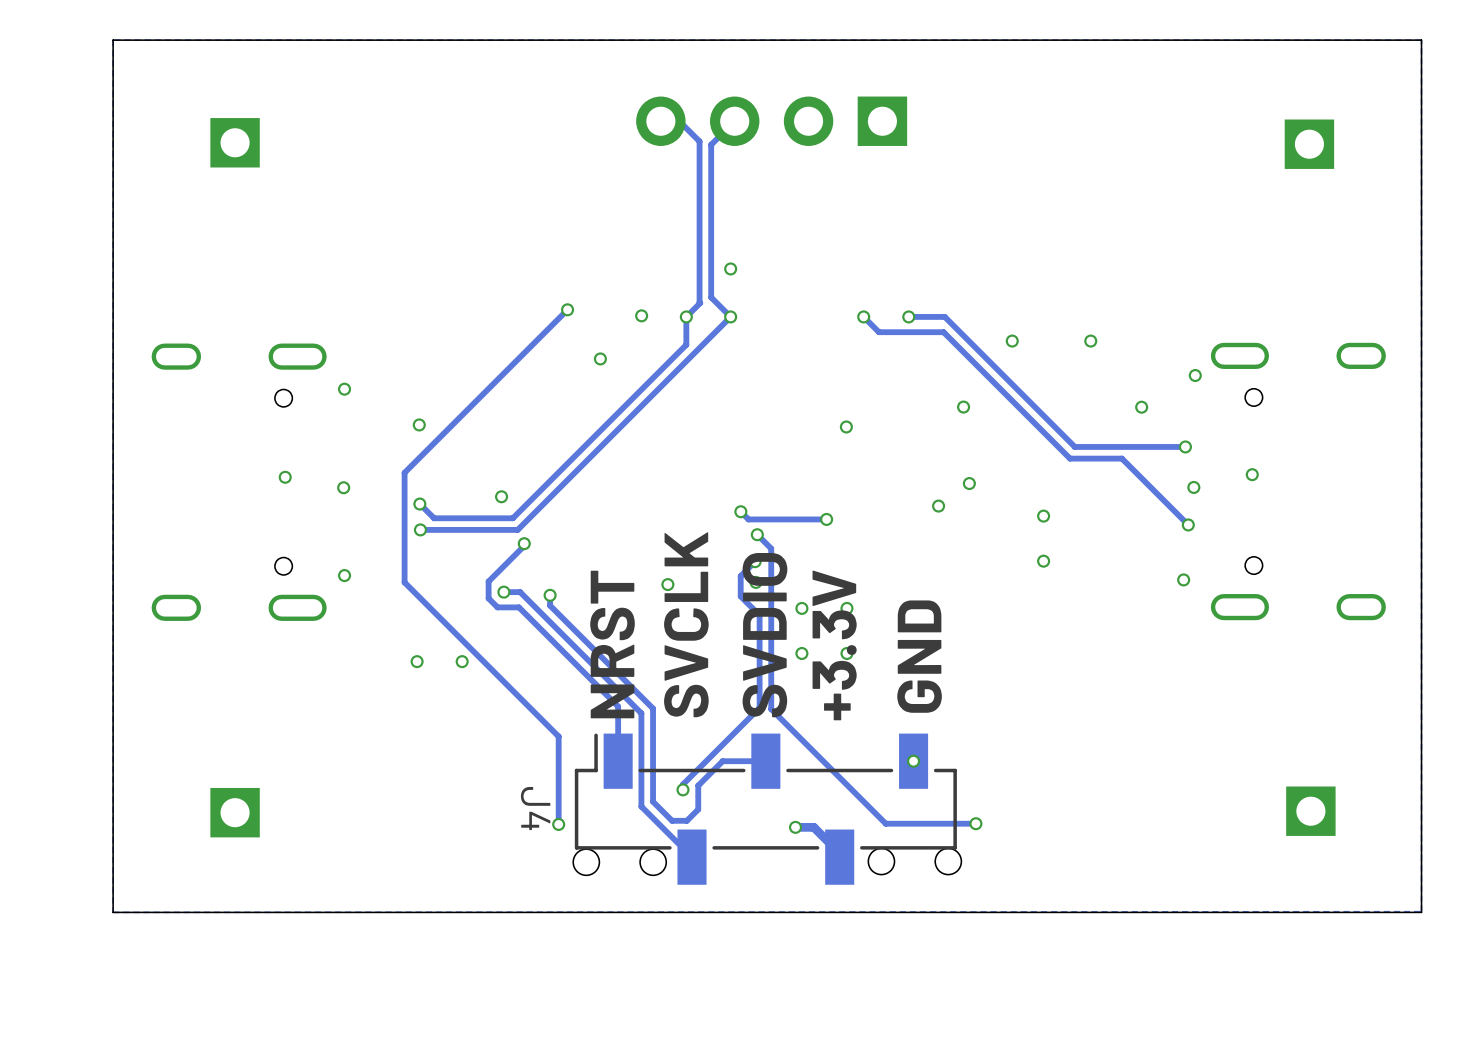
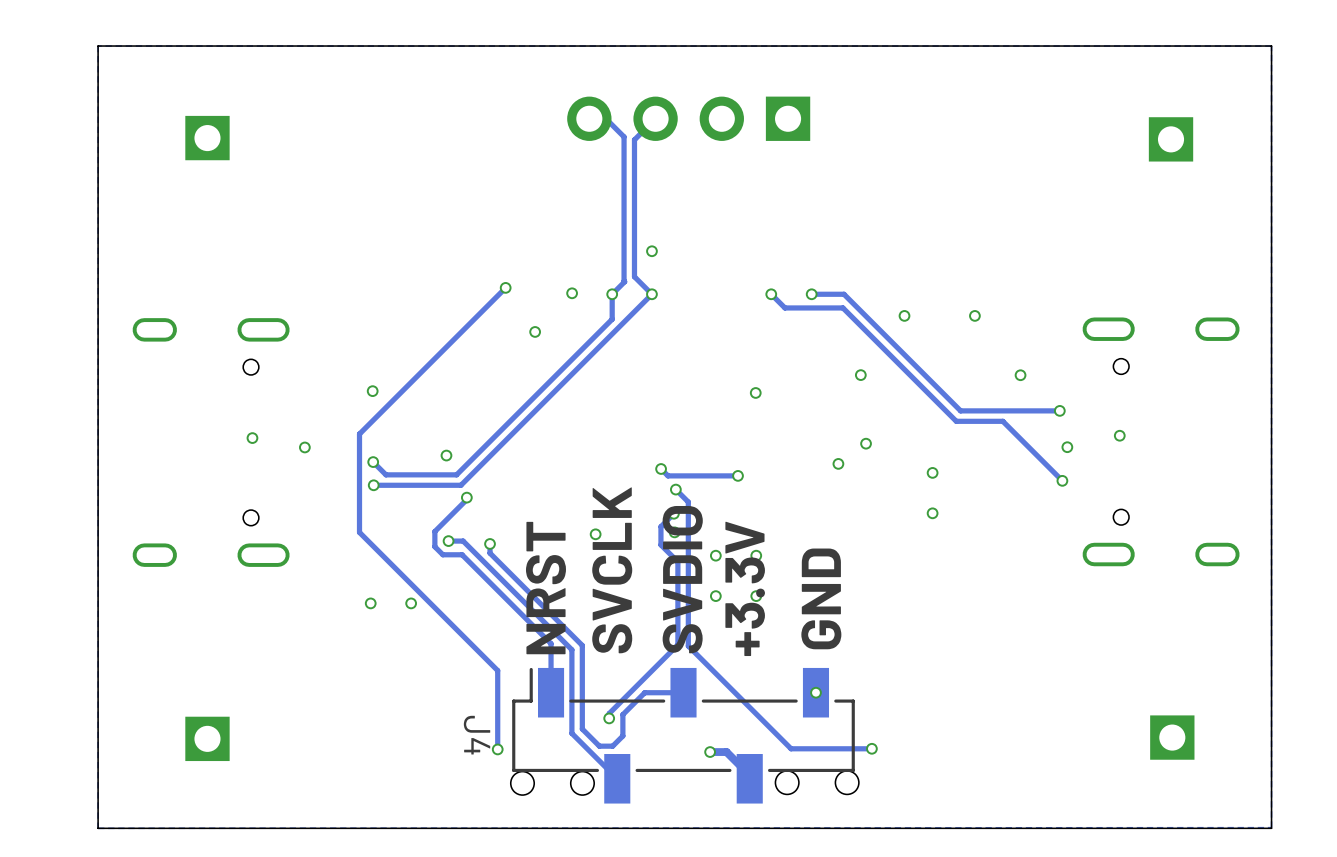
via: (1195, 375) -> none
via: (344, 389) -> none
via: (344, 575) -> none
via: (1183, 579) -> none

